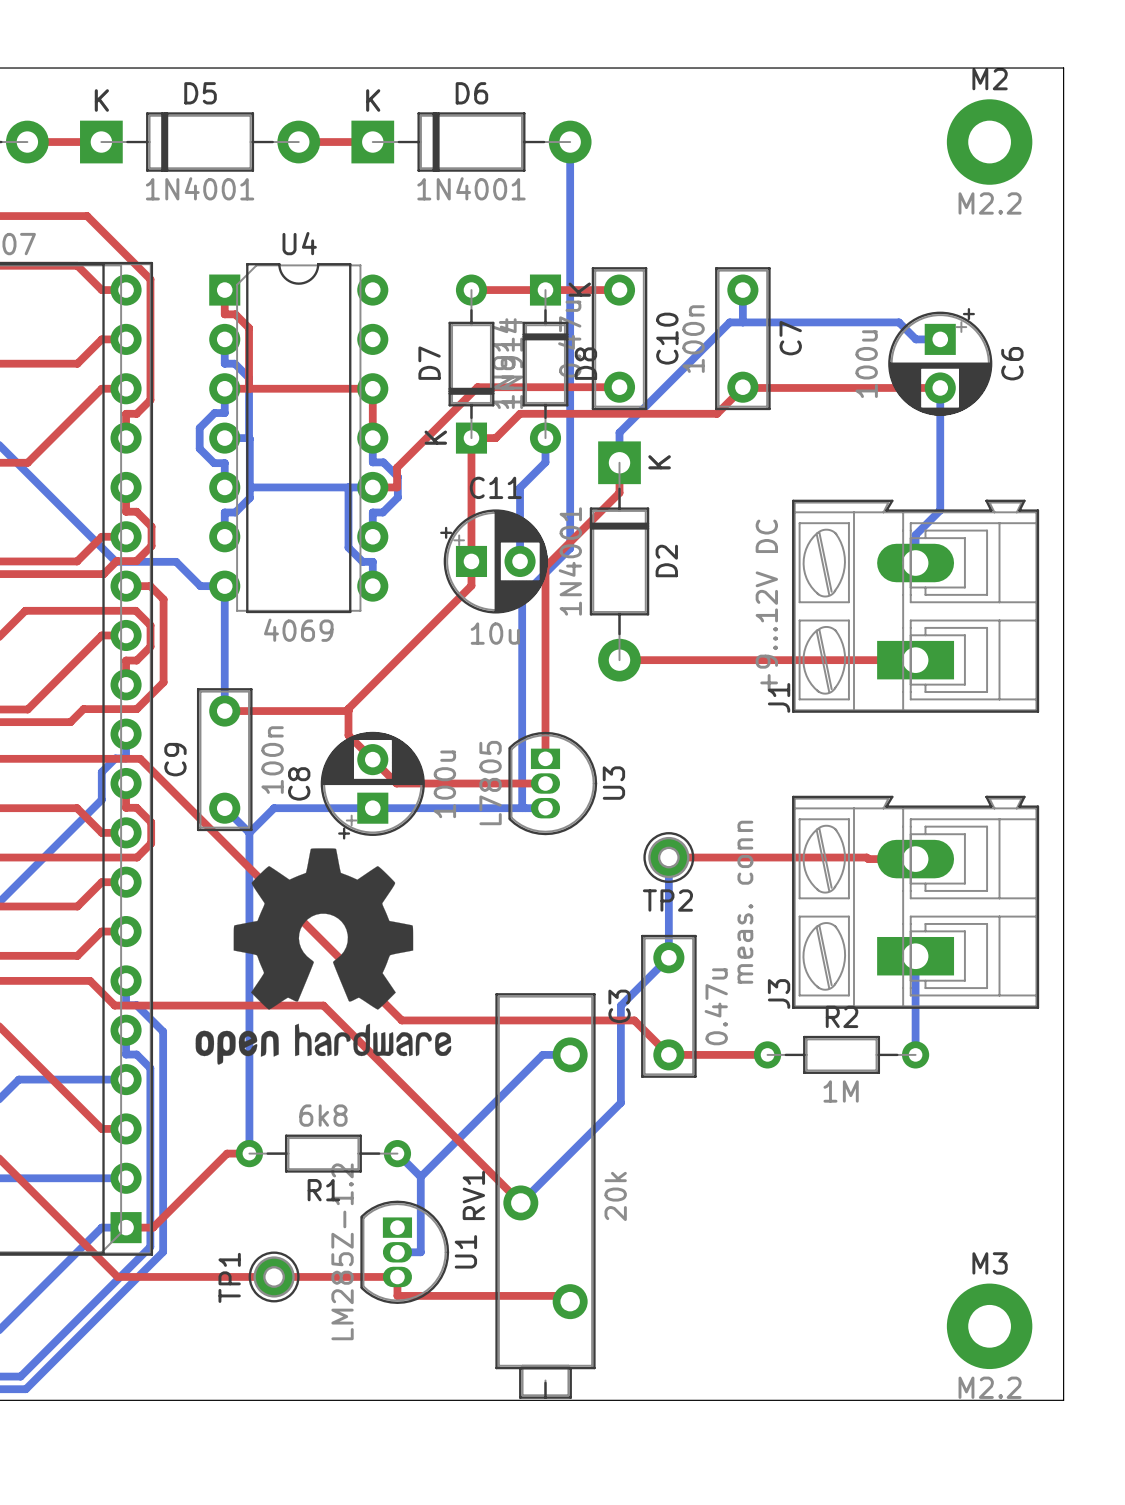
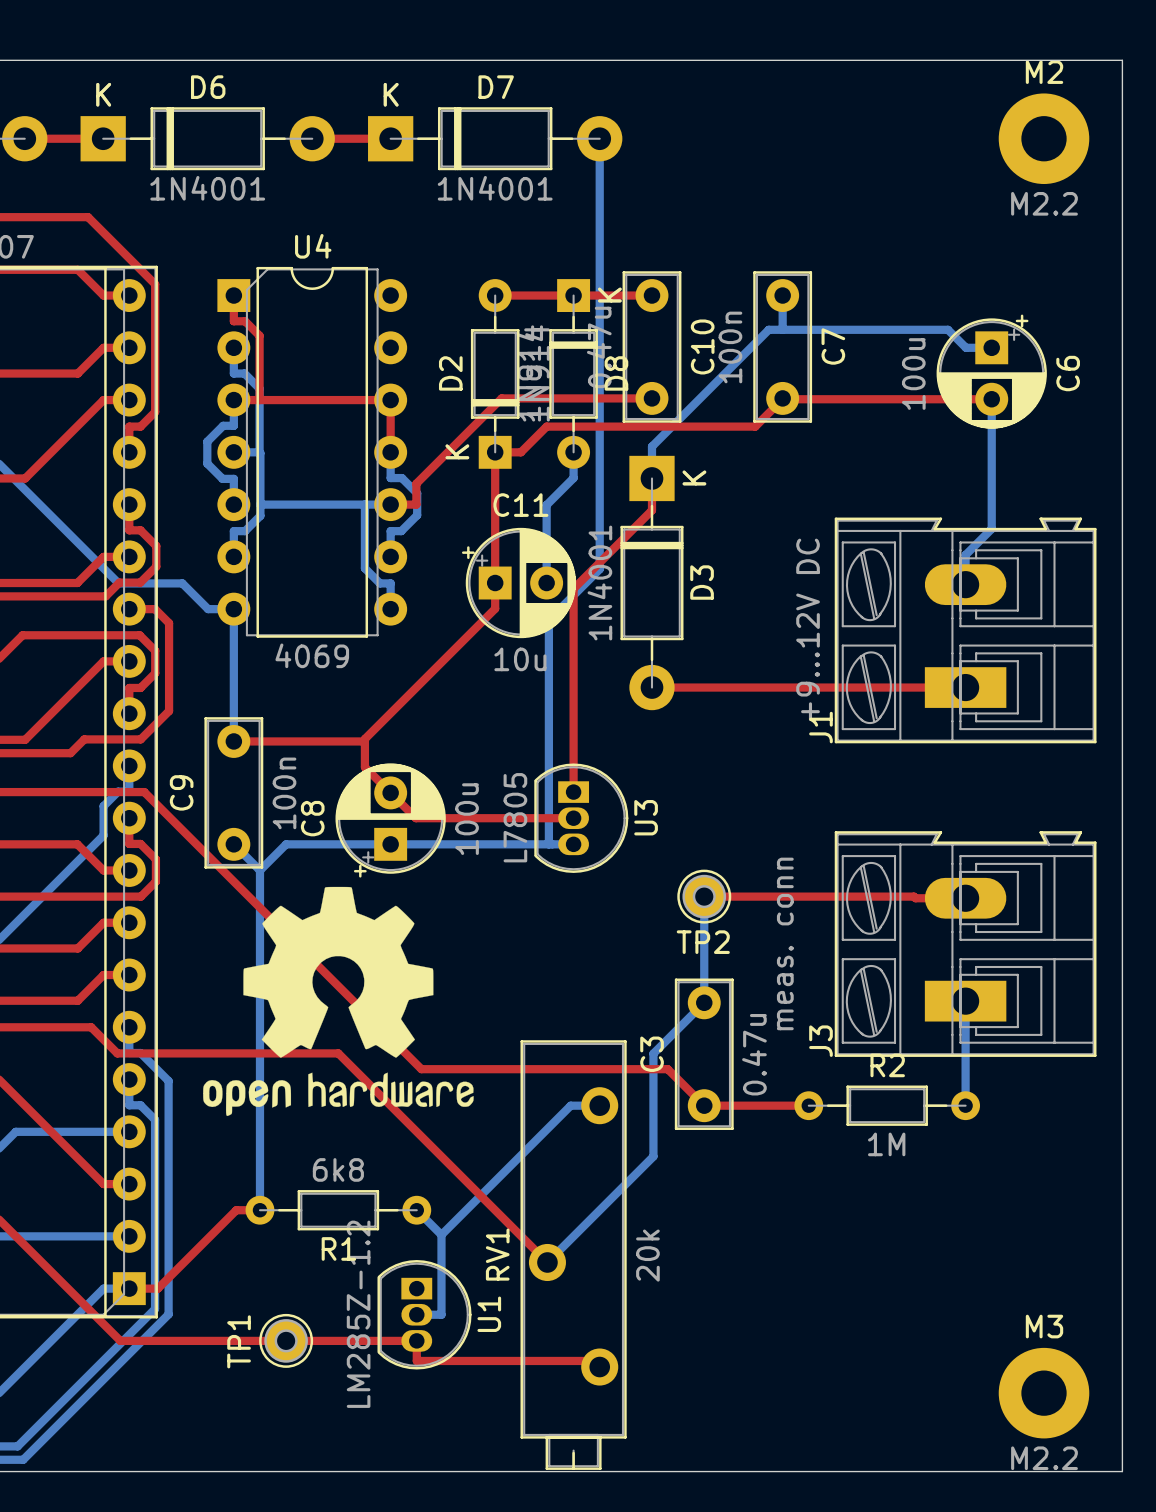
D5 name: D5 (200, 93) -> D6 (208, 87)
D6 name: D6 (471, 93) -> D7 (496, 87)
D7 name: D7 (429, 363) -> D2 (450, 373)
D2 name: D2 (666, 561) -> D3 (702, 582)

